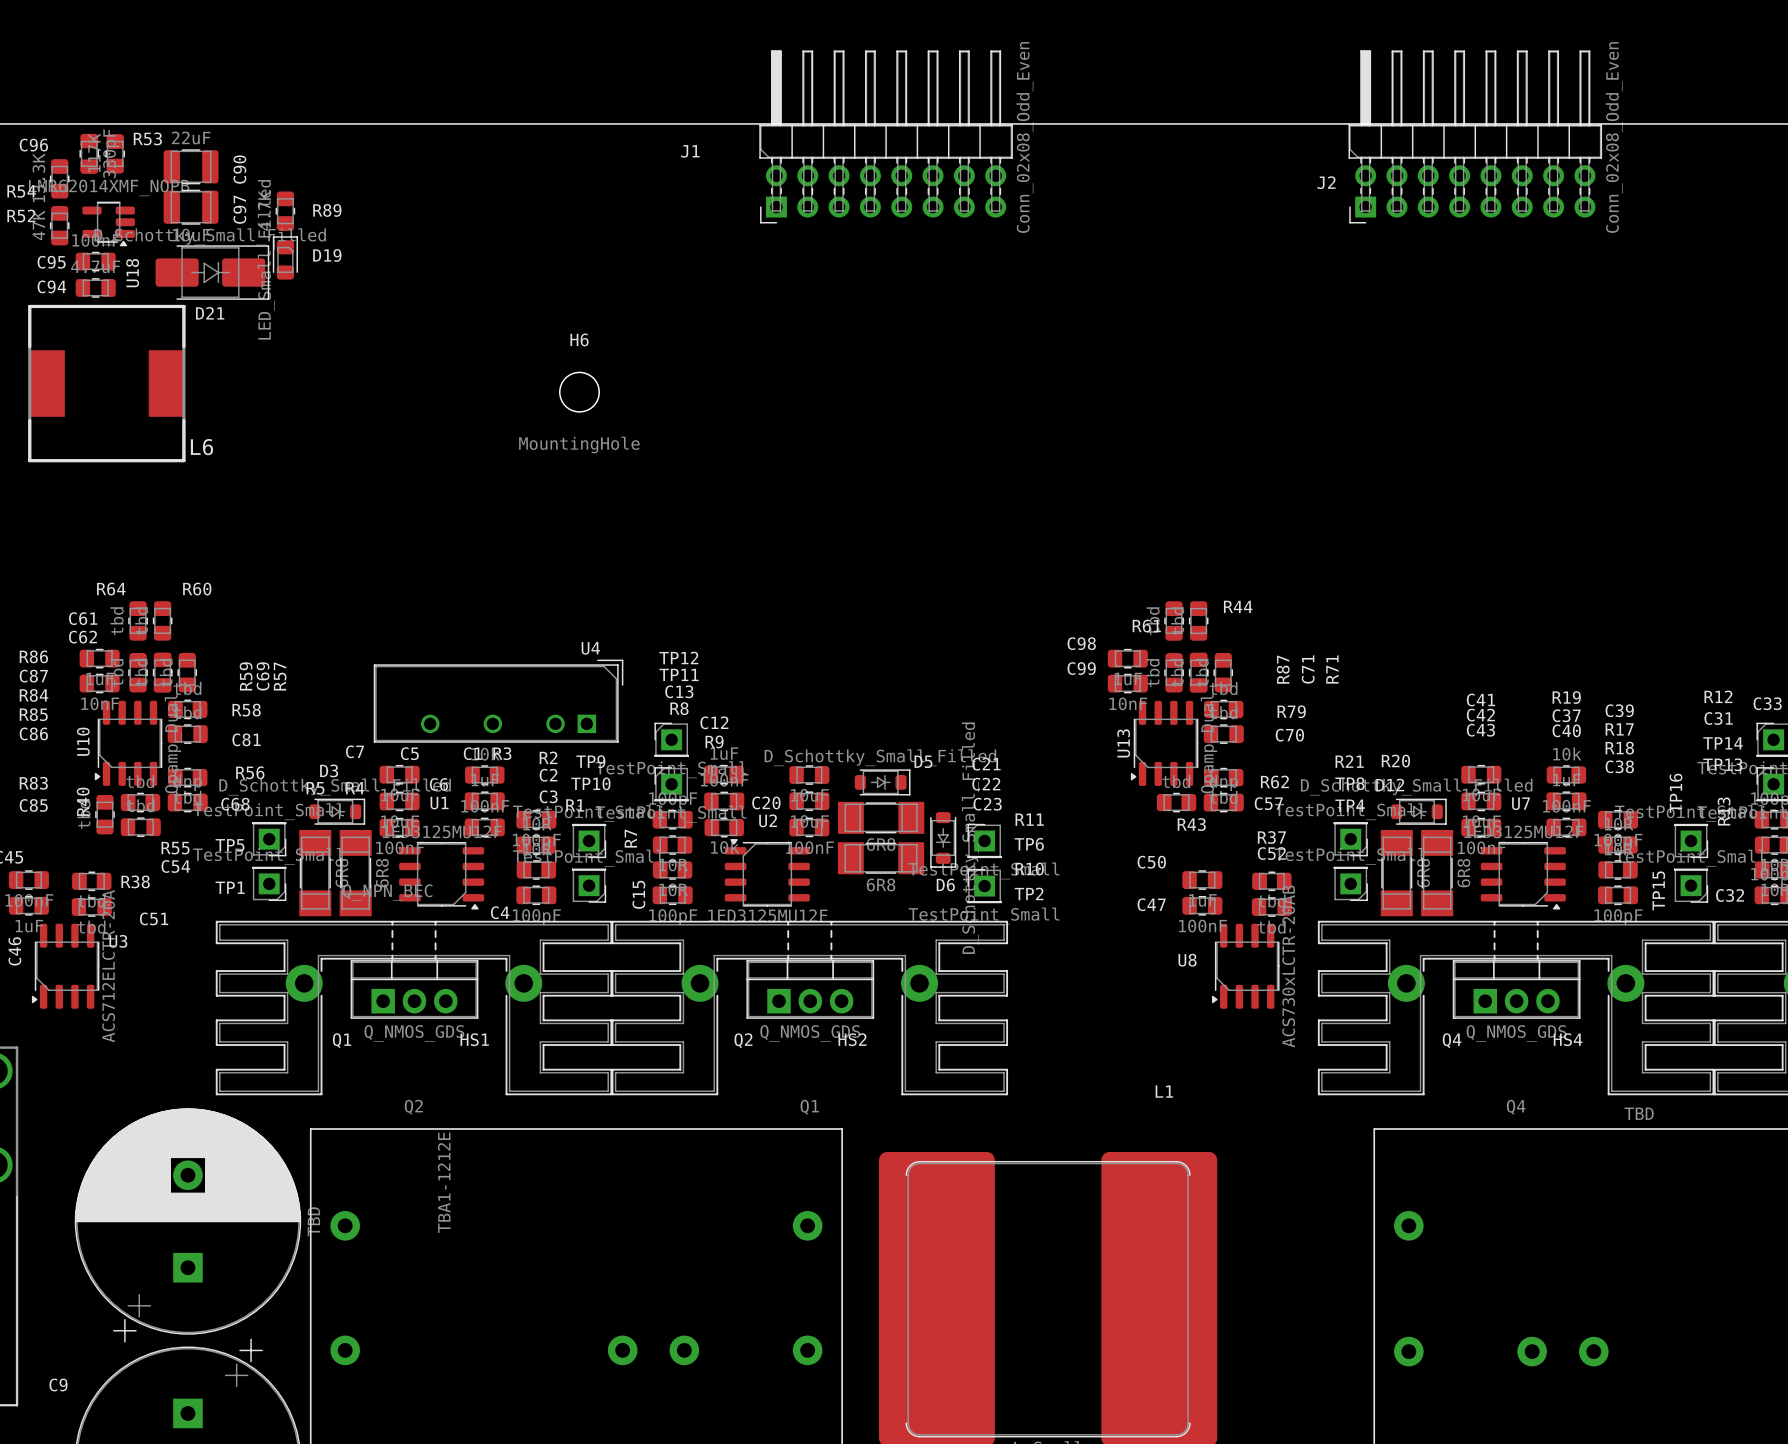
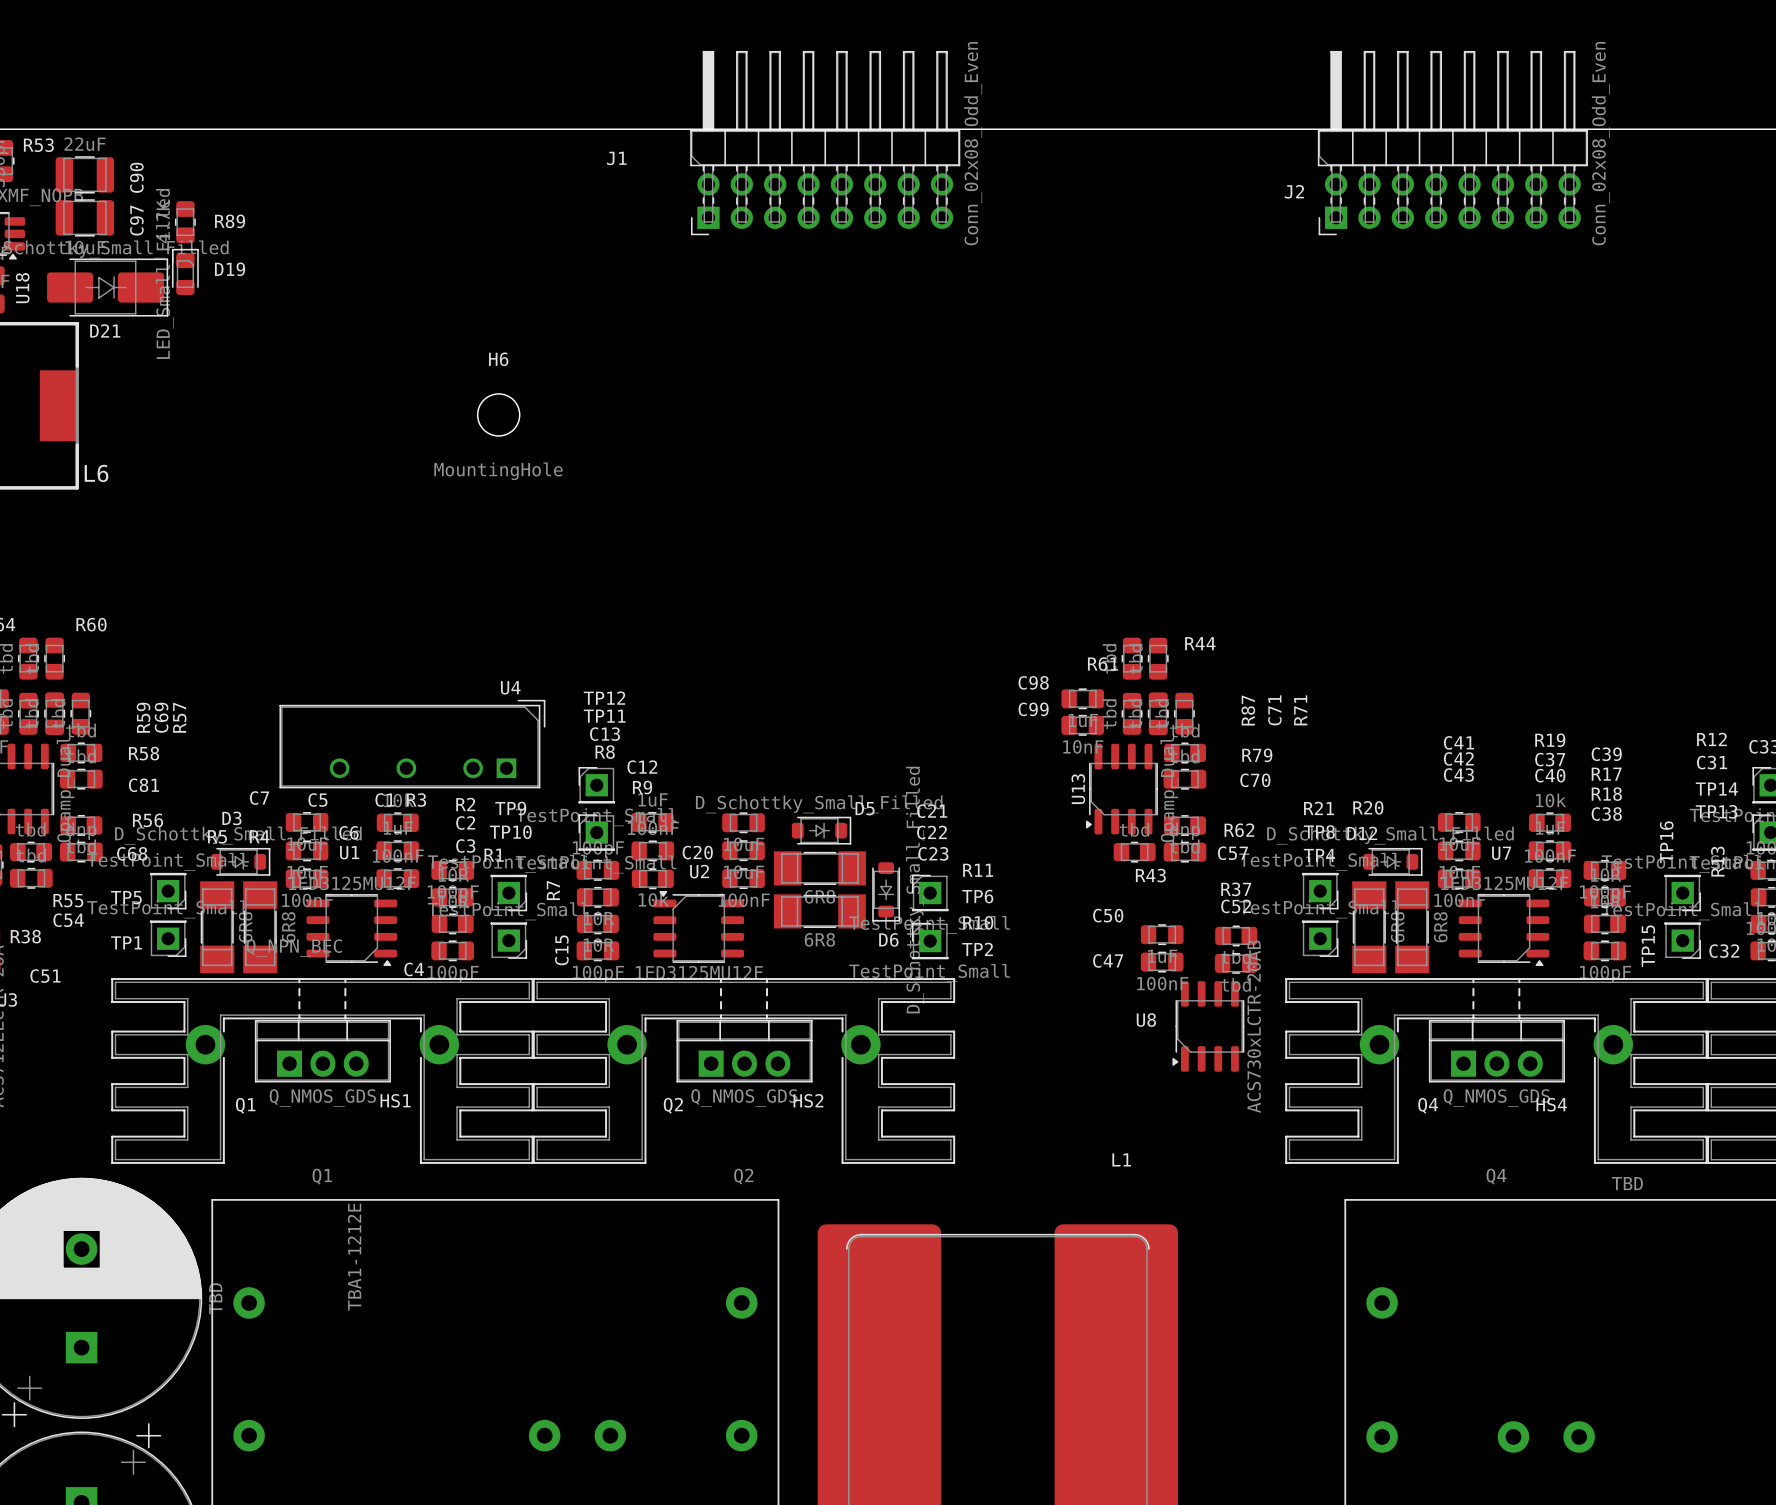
HS1 name: HS1 (474, 1039) -> HS2 (808, 1100)
HS2 name: HS2 (852, 1039) -> HS1 (395, 1100)
HS2 value: Q2 (413, 1107) -> Q1 (322, 1176)
HS1 value: Q1 (809, 1107) -> Q2 (743, 1176)

